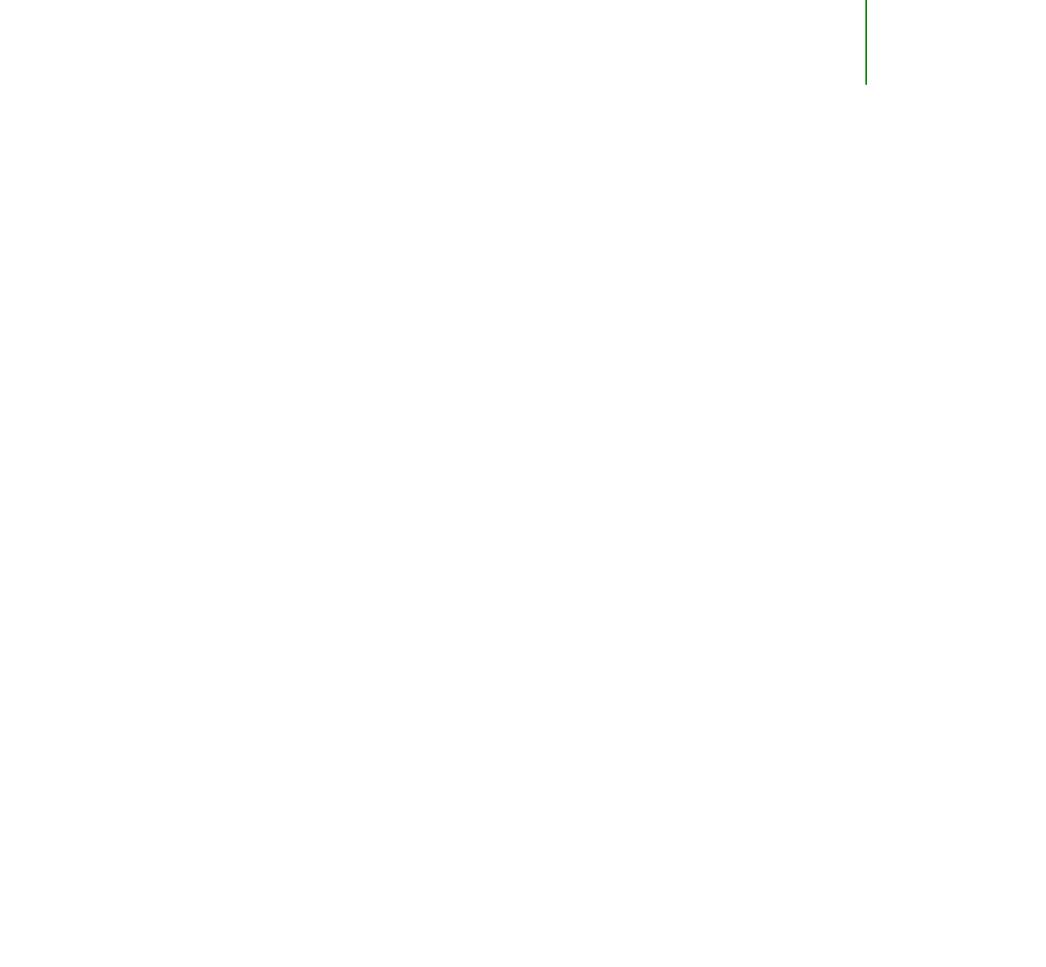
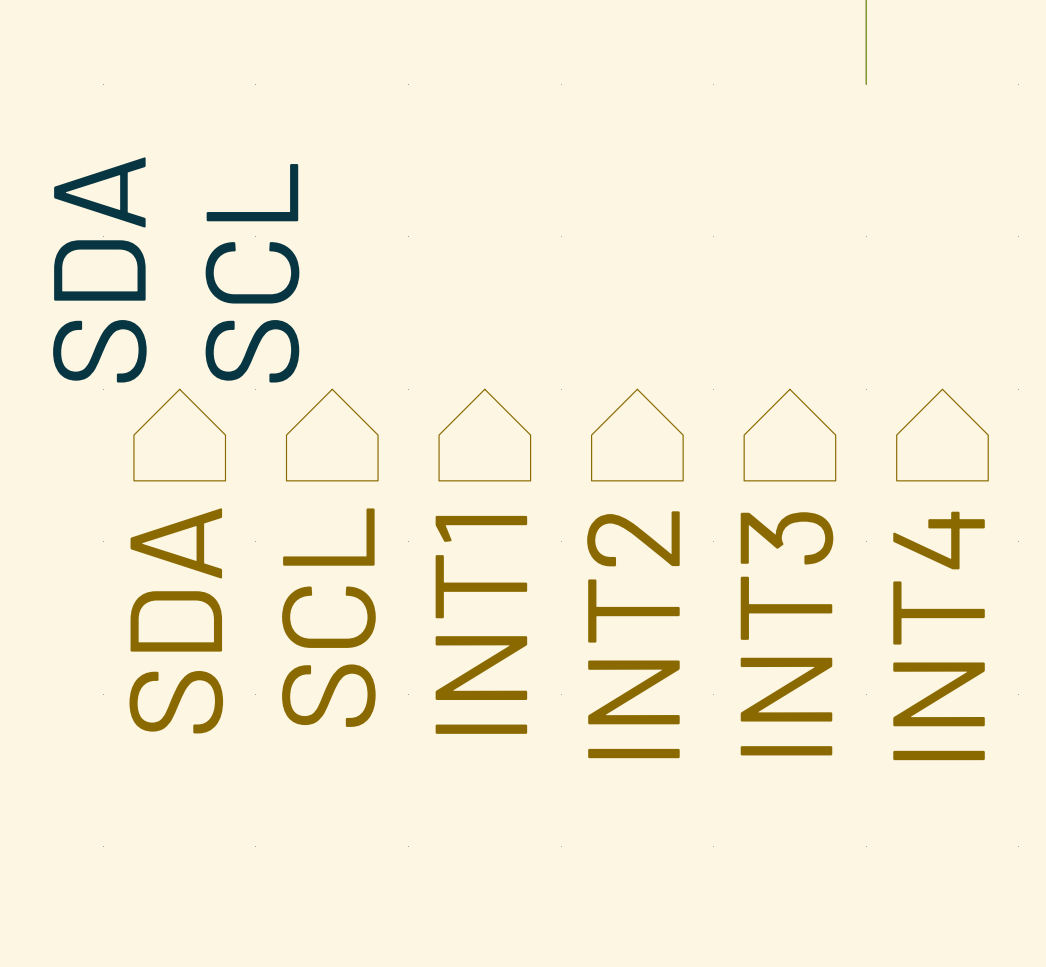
label: none -> SDA (99, 269)
label: none -> SCL (252, 273)
hierarchical label: none -> SCL (328, 617)
hierarchical label: none -> SDA (176, 620)
hierarchical label: none -> INT4 (939, 635)
hierarchical label: none -> INT1 (481, 624)
hierarchical label: none -> INT2 (633, 634)
hierarchical label: none -> INT3 (787, 633)

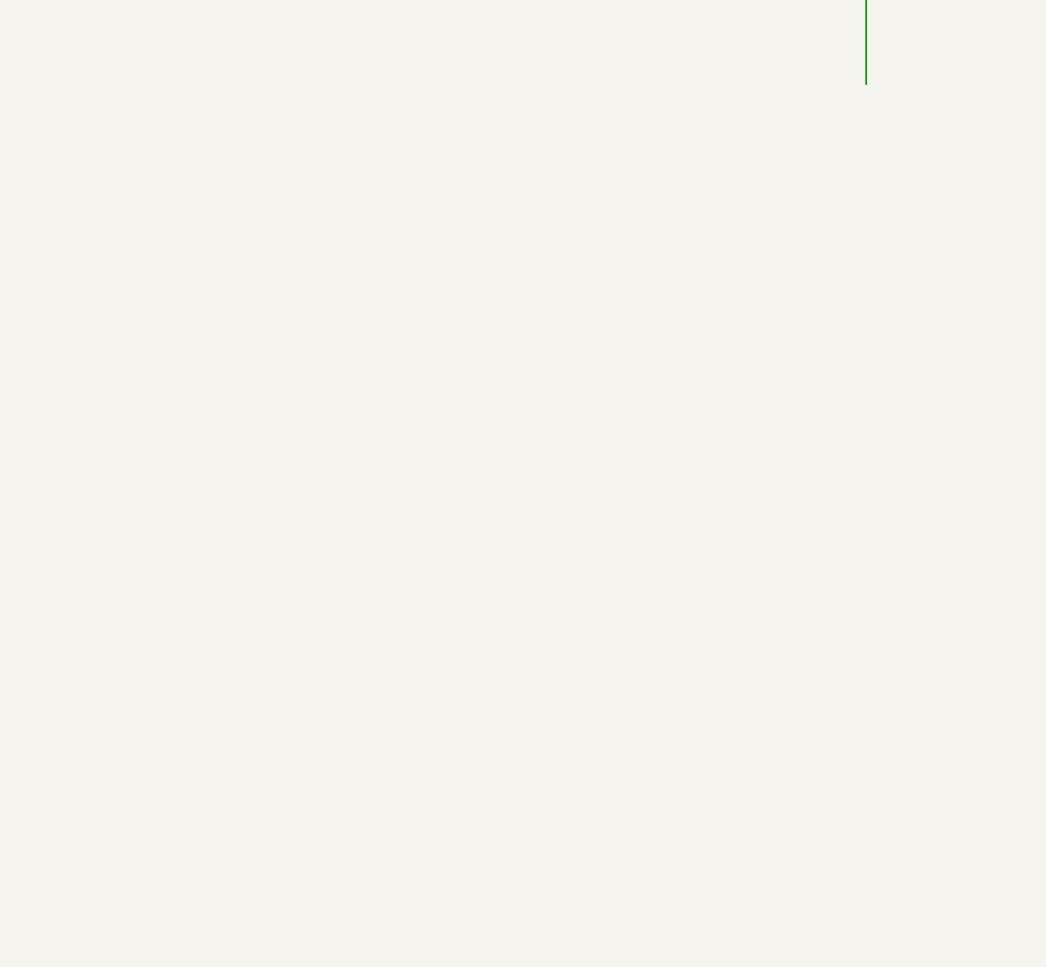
label: SDA (99, 269) -> none
label: SCL (252, 273) -> none
hierarchical label: SCL (328, 617) -> none
hierarchical label: SDA (176, 620) -> none
hierarchical label: INT1 (481, 624) -> none
hierarchical label: INT3 (787, 633) -> none
hierarchical label: INT2 (633, 634) -> none
hierarchical label: INT4 (939, 635) -> none

